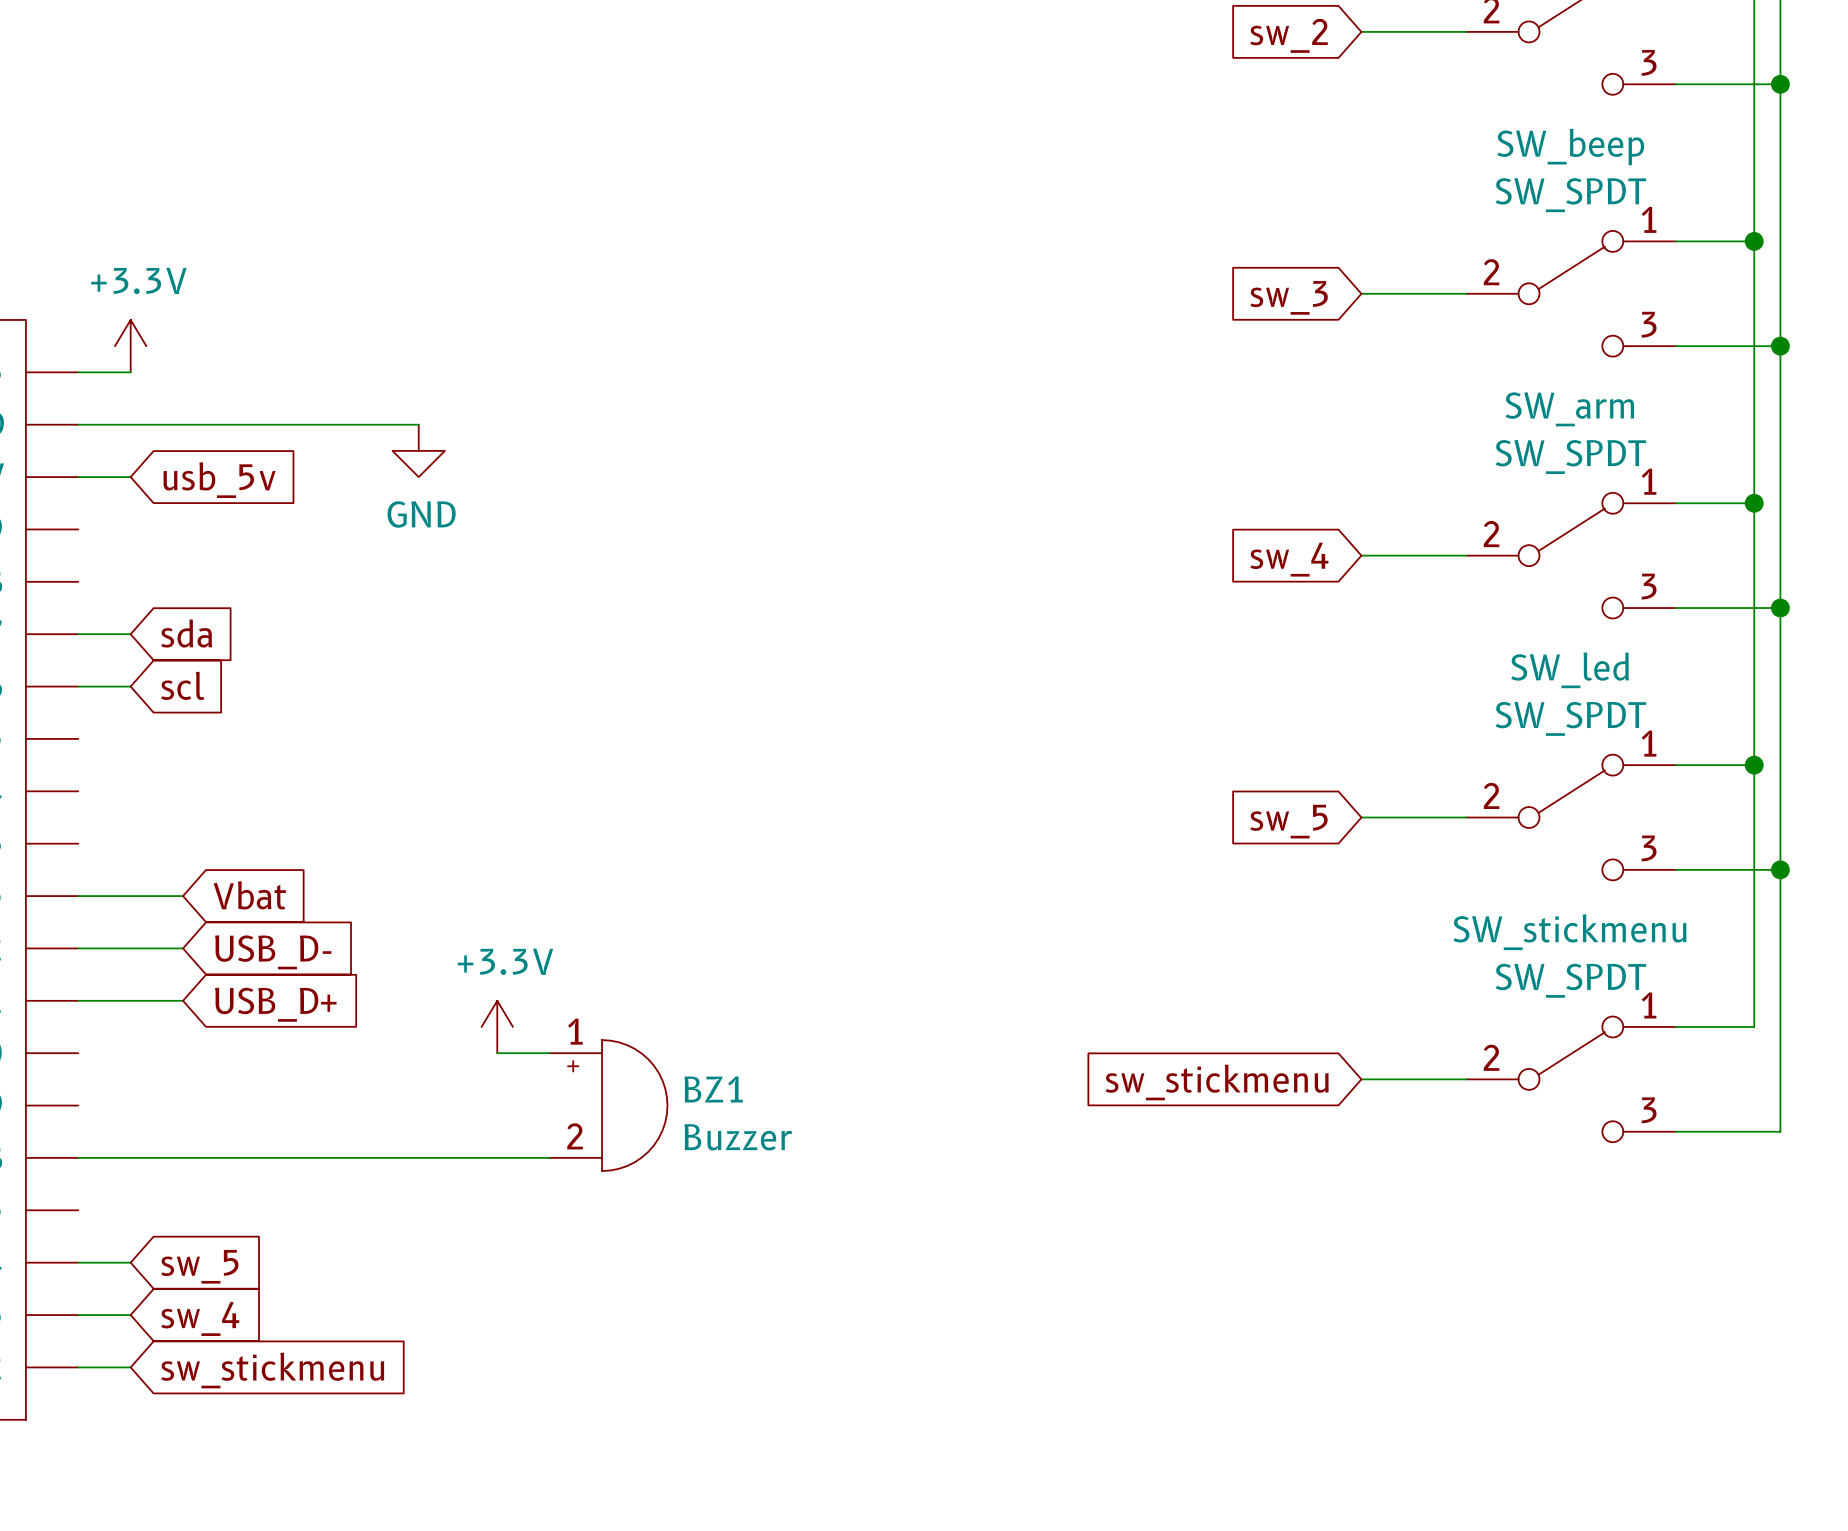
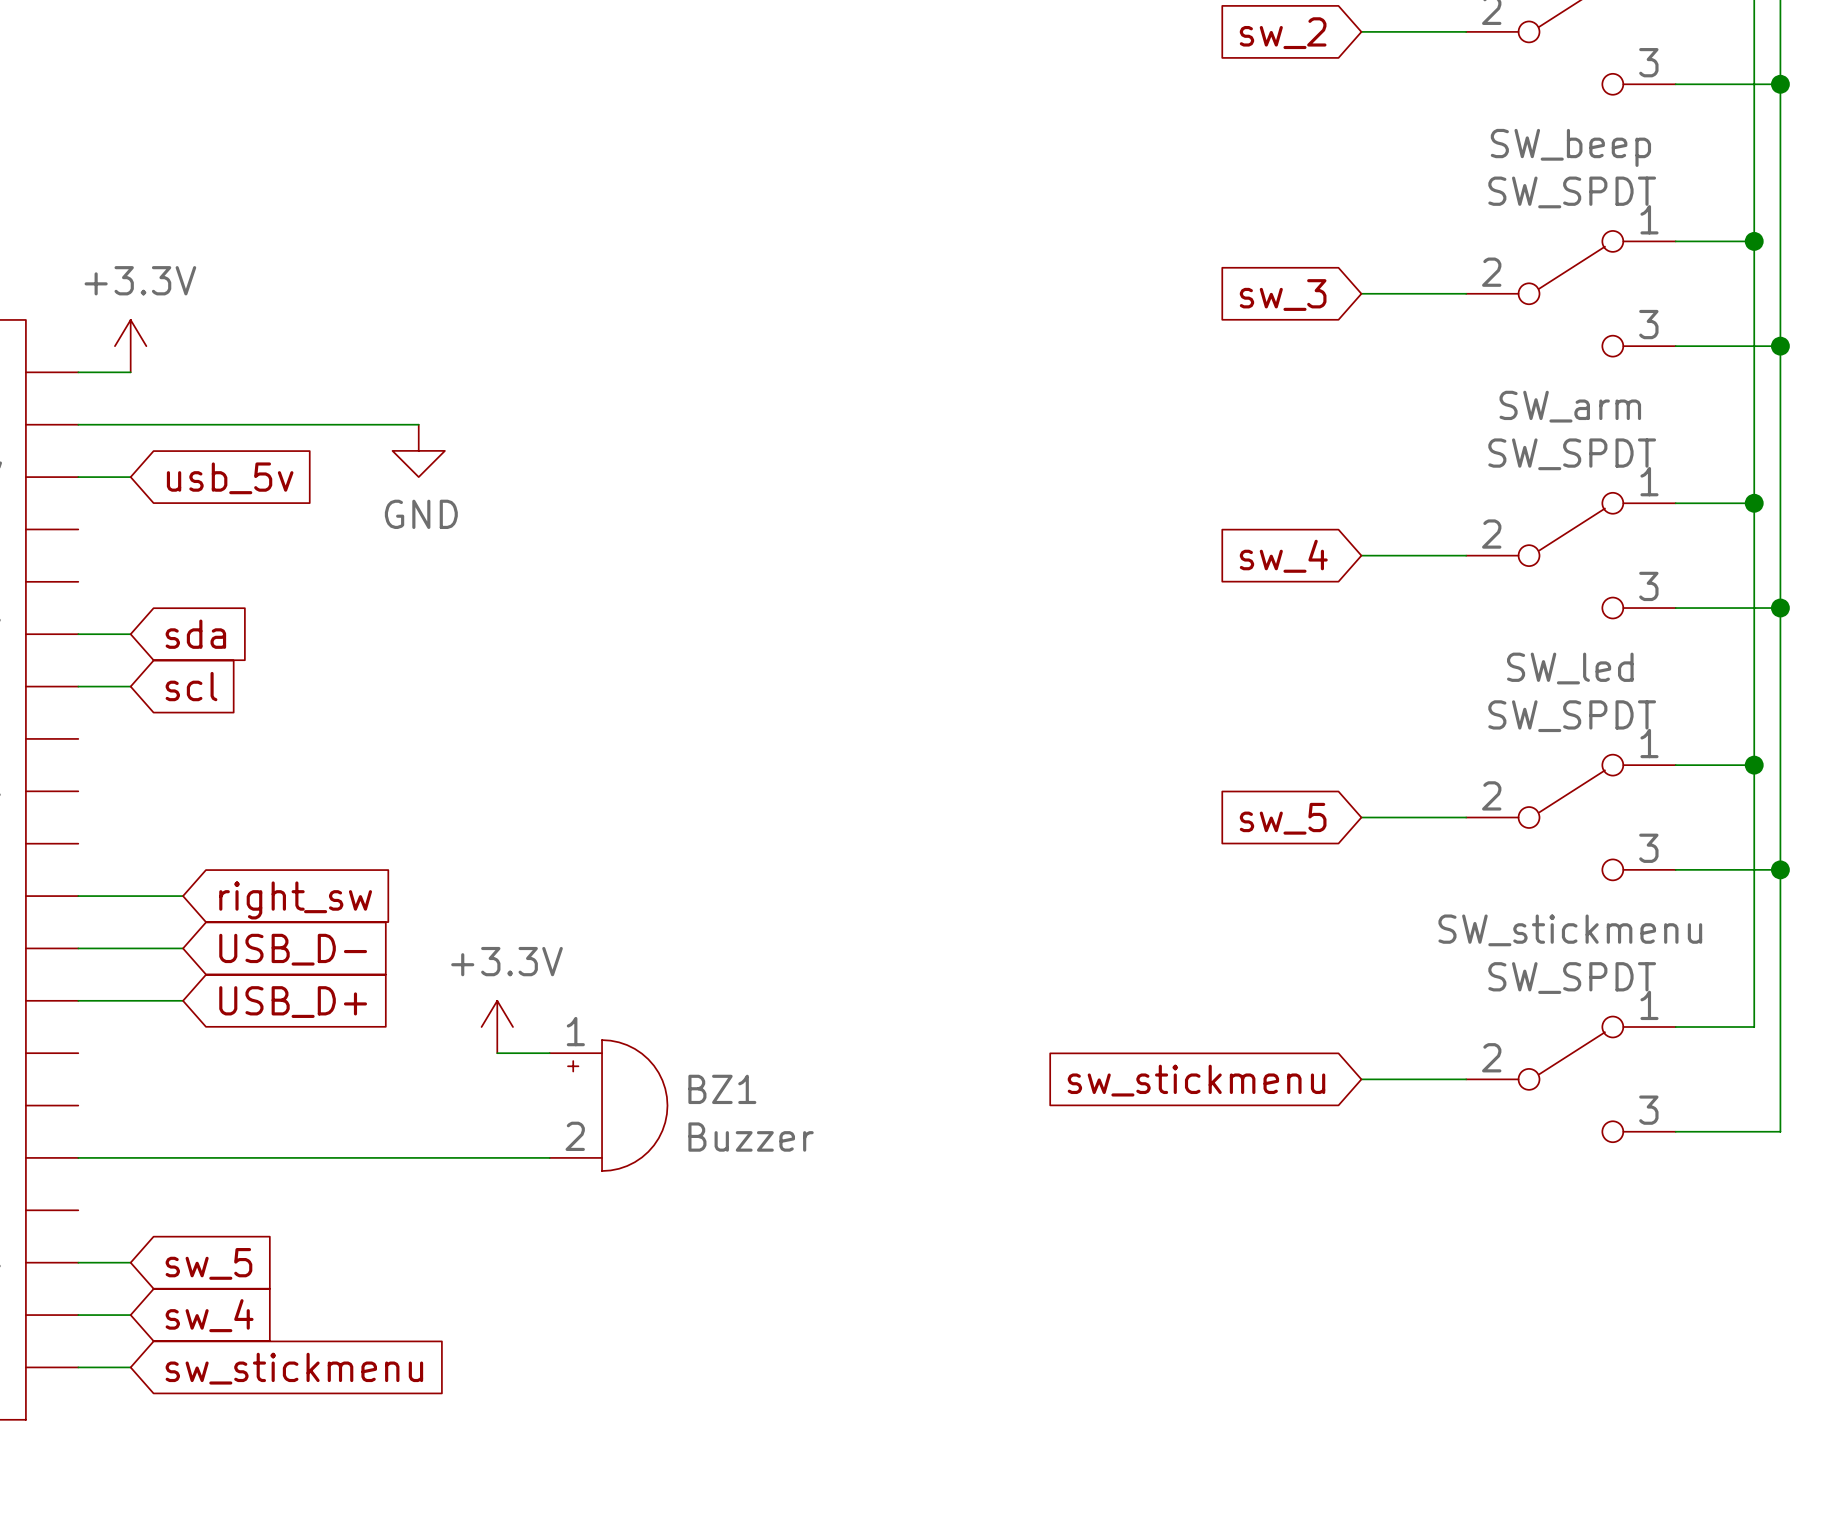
global label: Vbat (249, 895) -> right_sw (295, 900)

